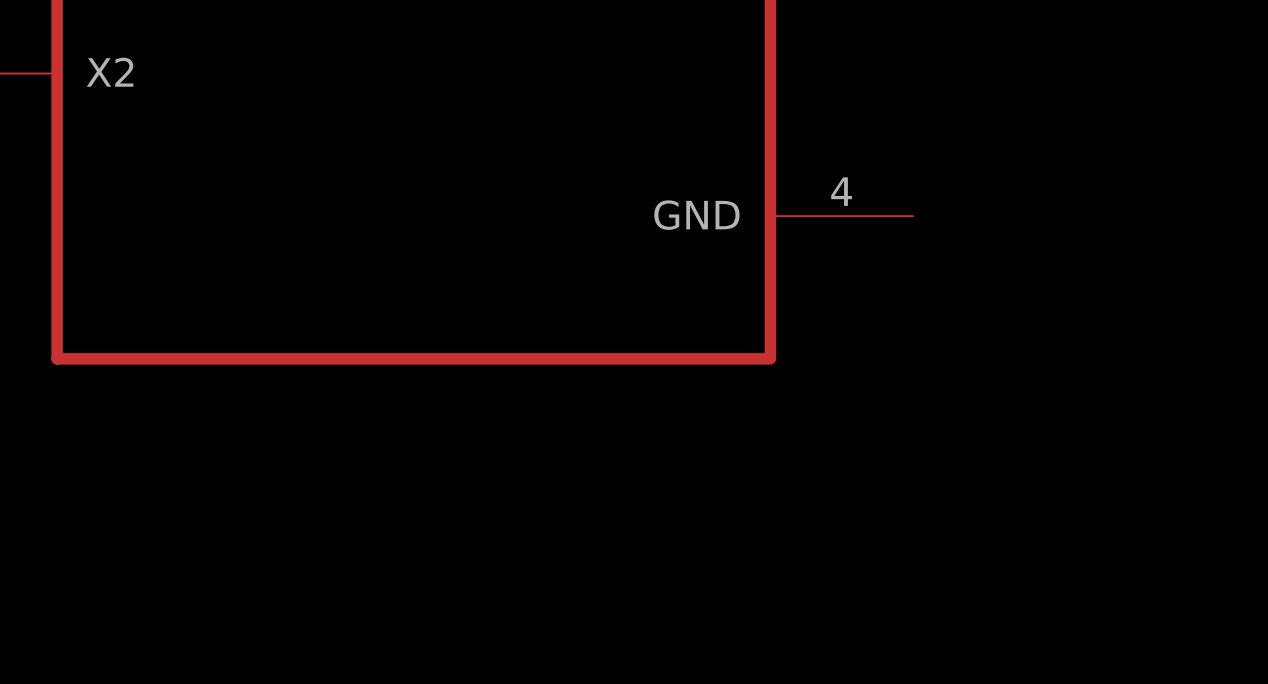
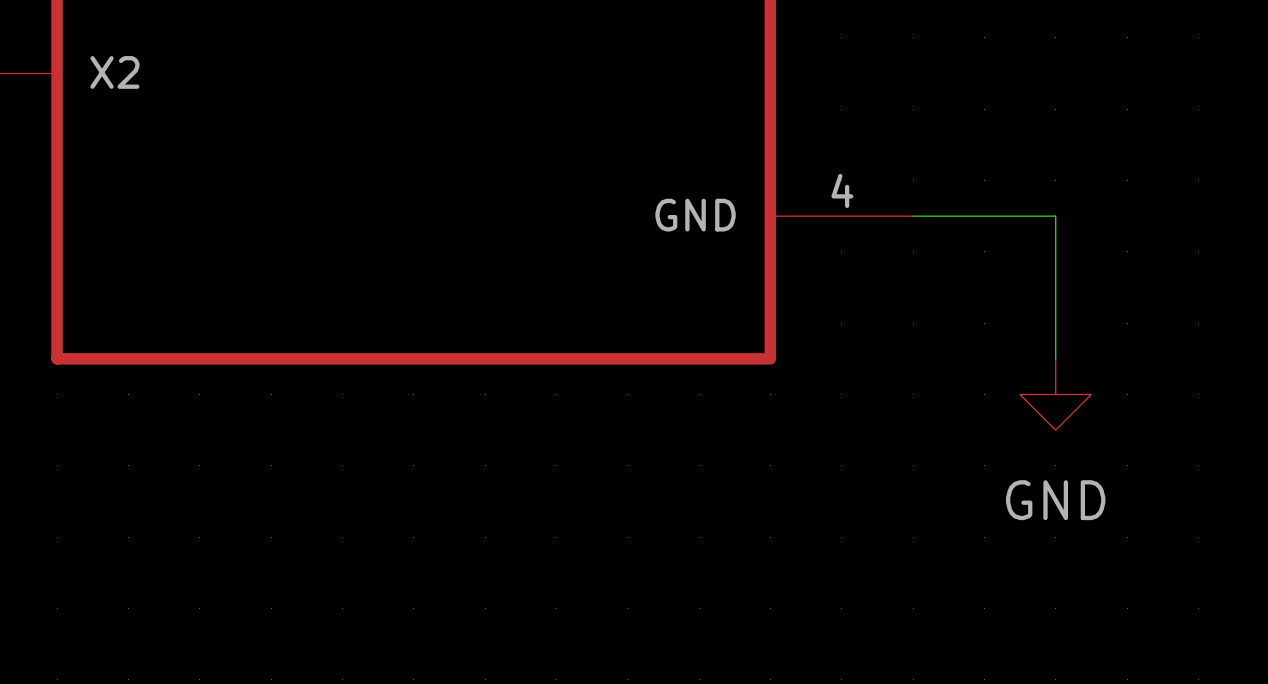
wire: none -> (913, 216) (1055, 216) (1055, 358)
power symbol: none -> GND (1055, 394)

